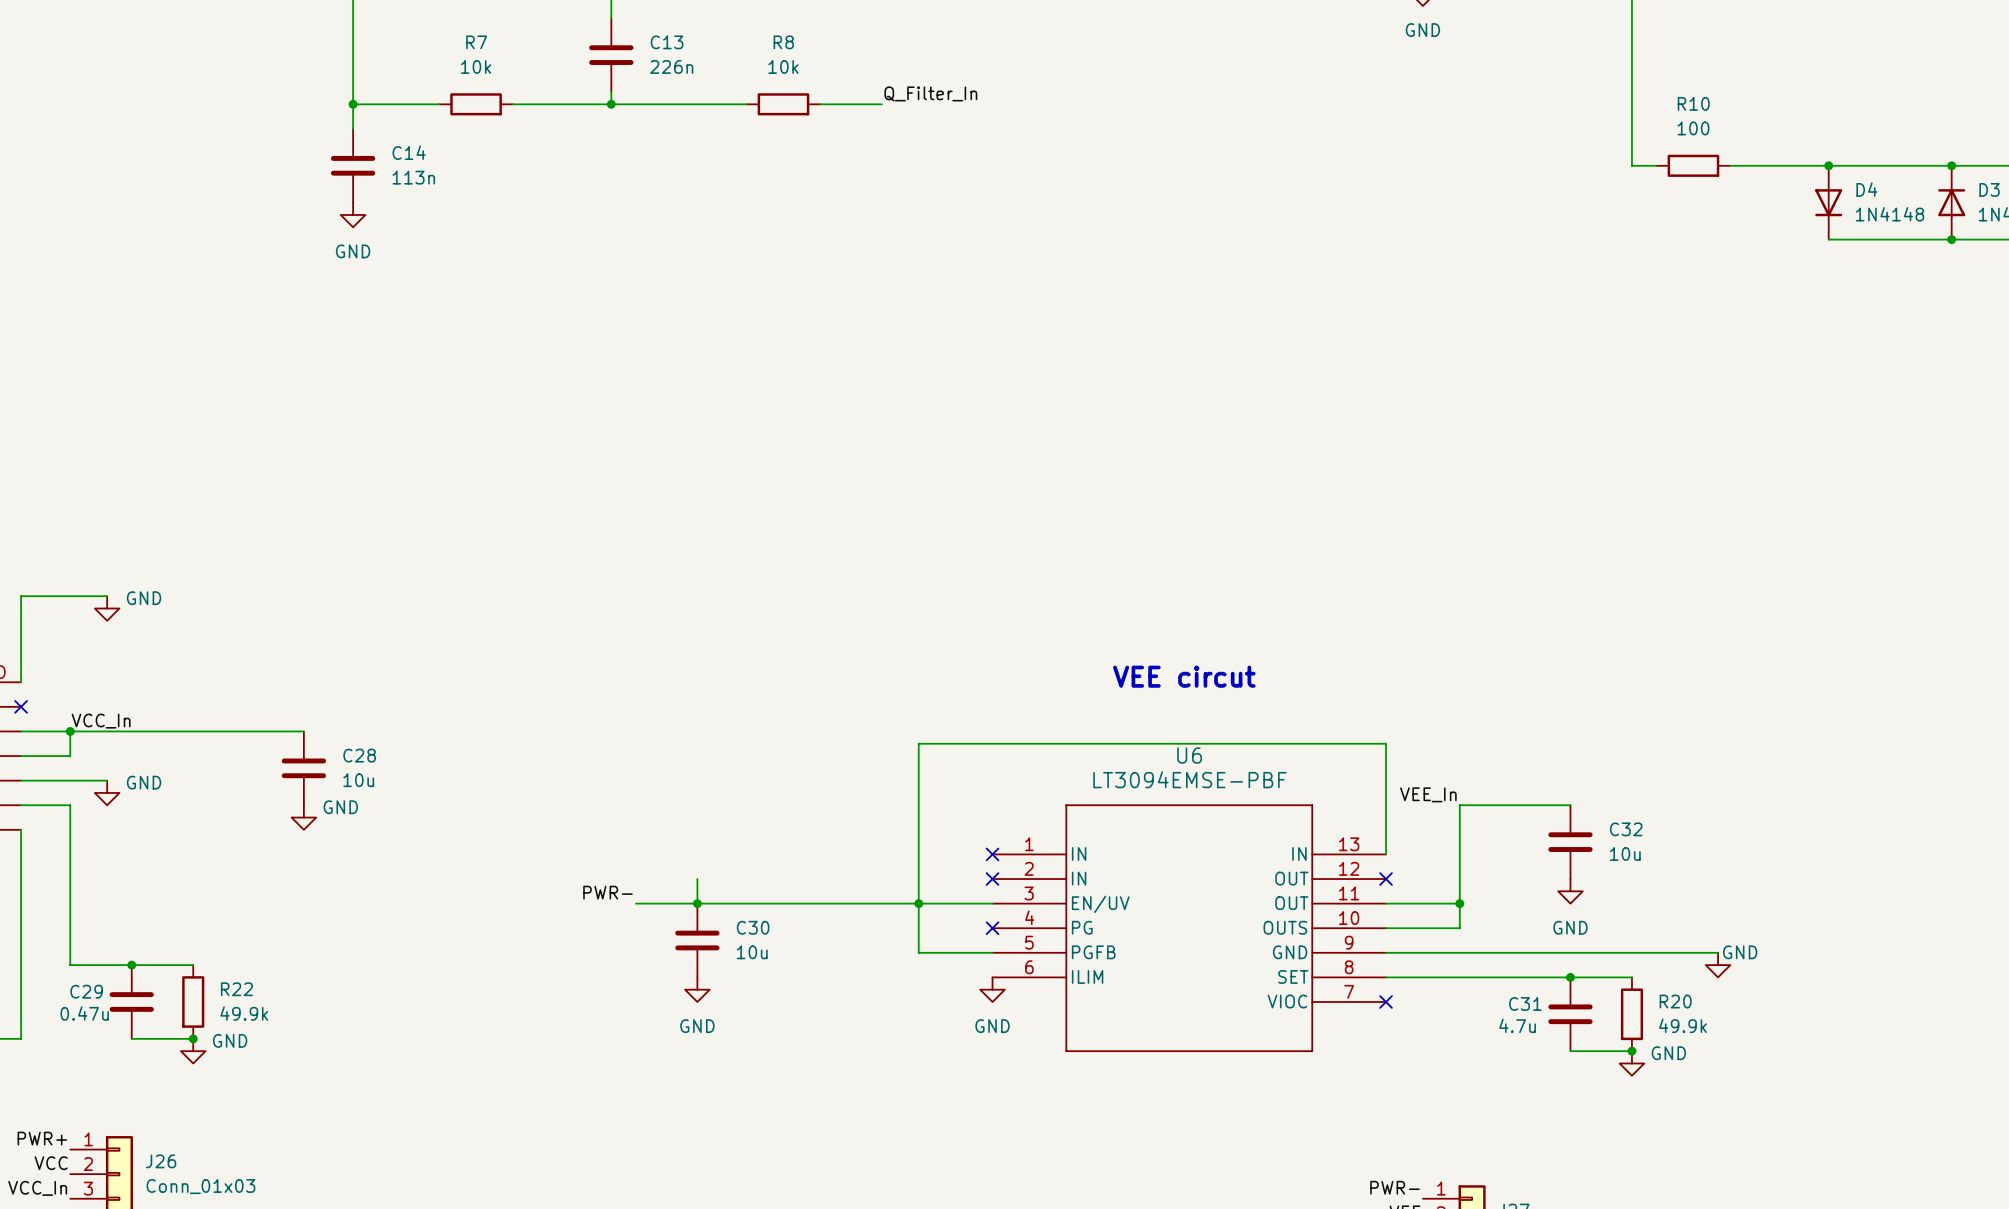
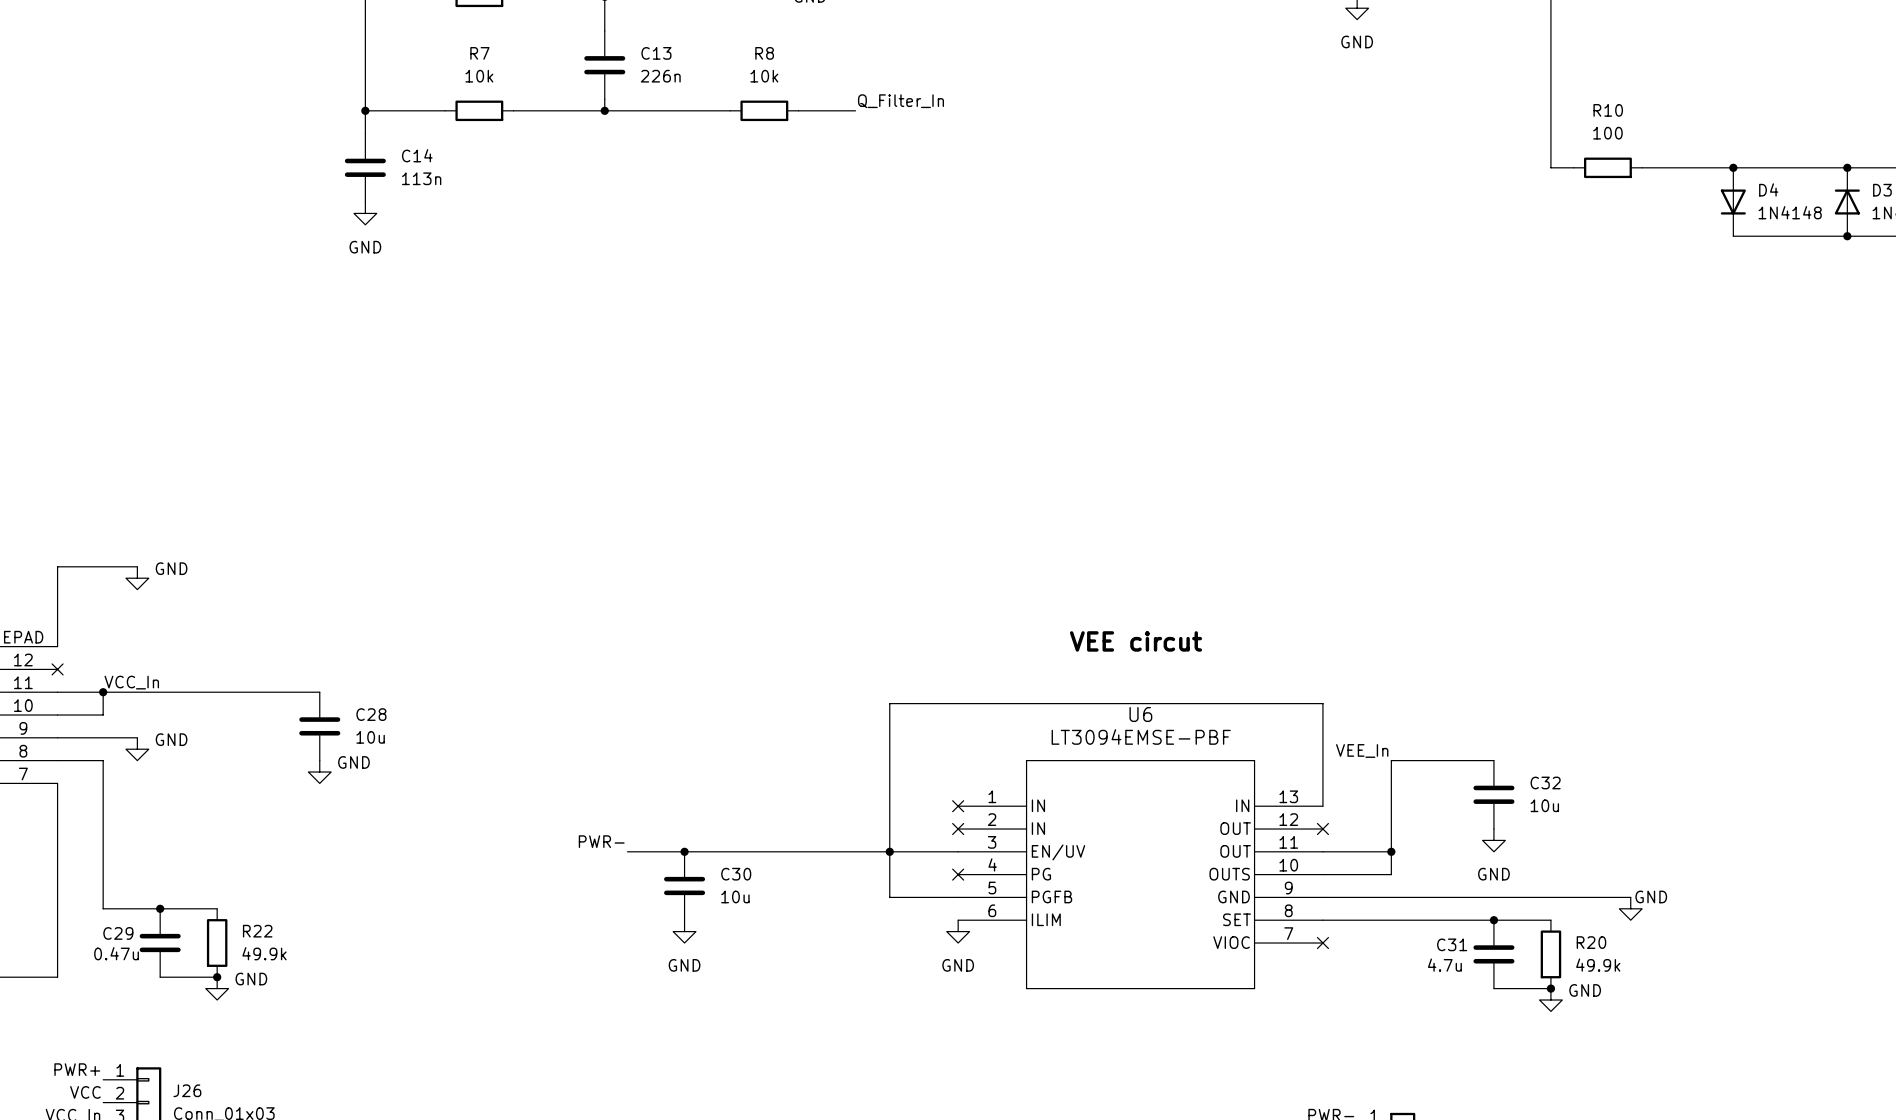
wire: (697, 879) (697, 903) -> none

